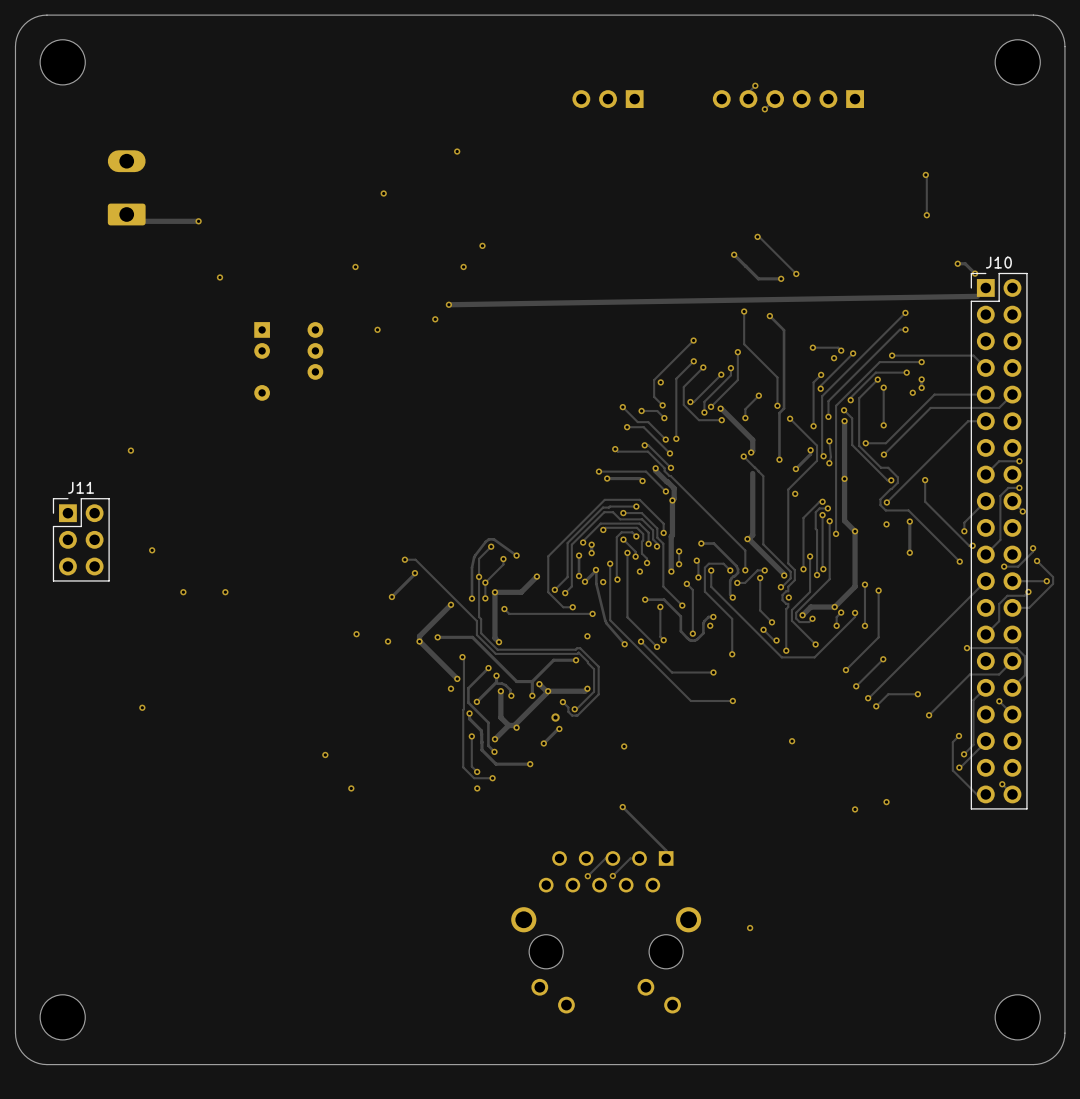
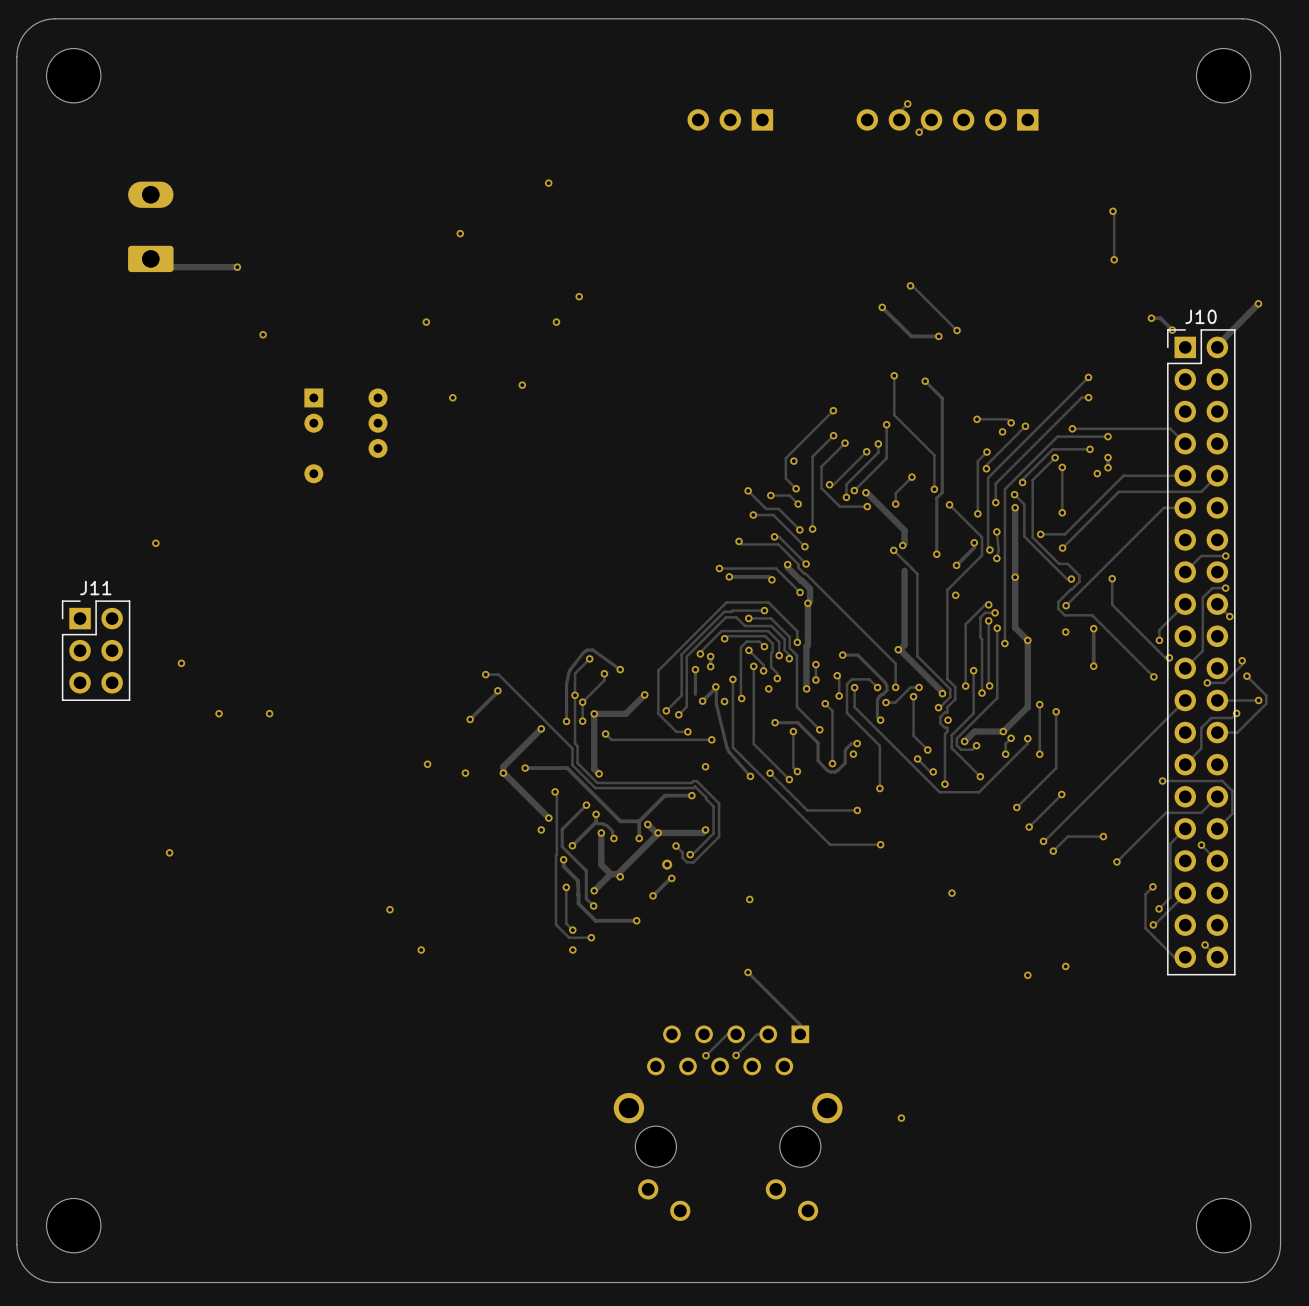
track: none -> (1258, 303) (1224, 338)
via: none -> (1258, 303)
track: (977, 296) (448, 304) -> none
via: (448, 304) -> none
via: (579, 576) -> none

